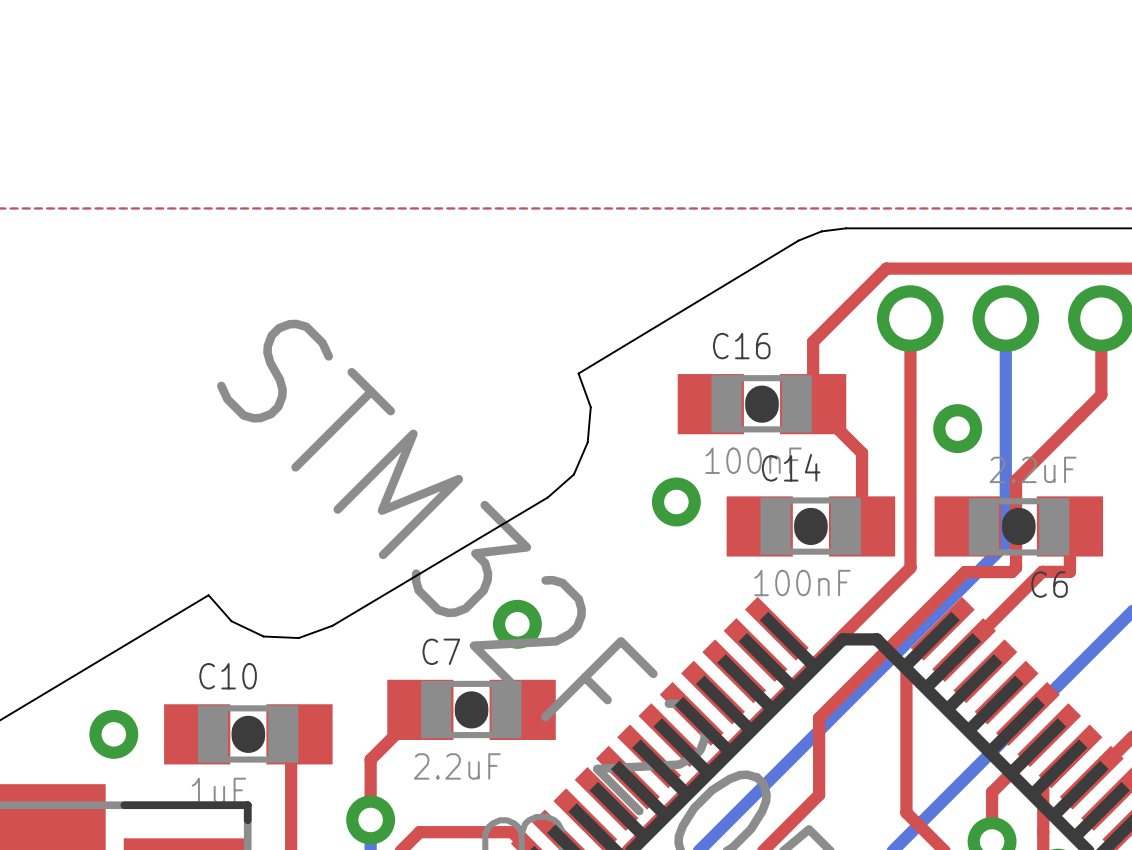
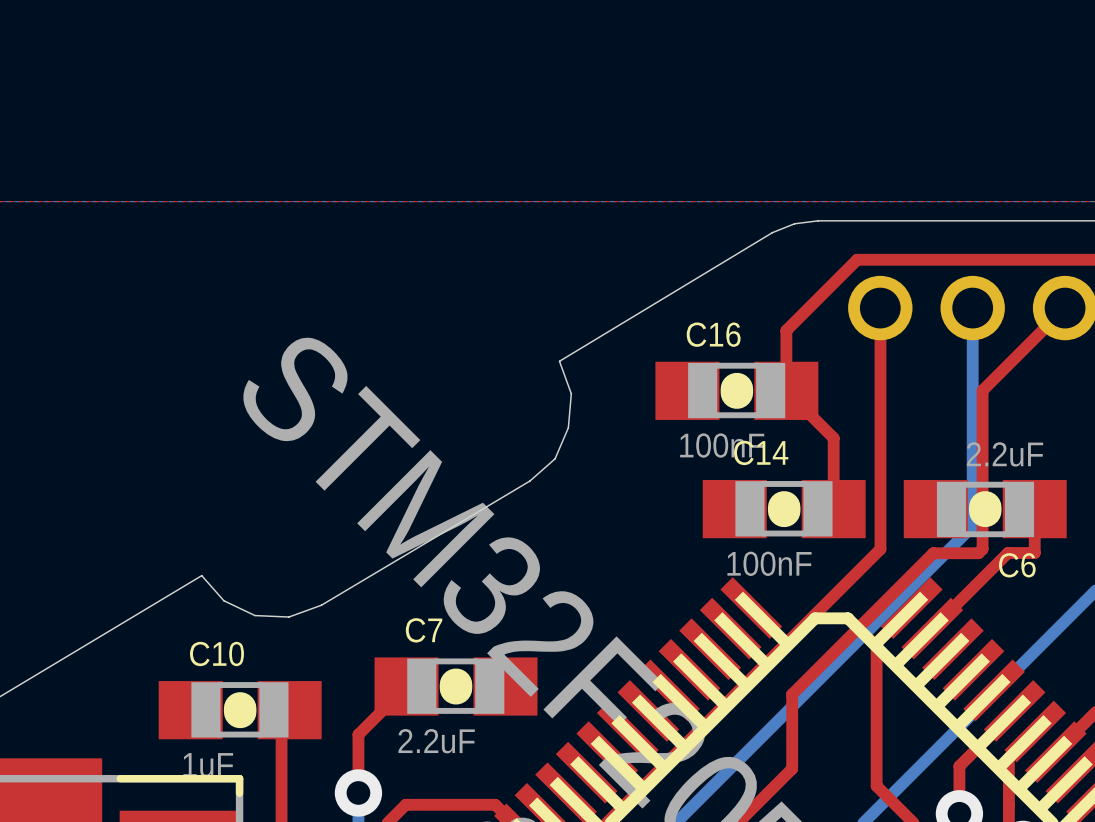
top track: (1101, 318) (1101, 394) (1016, 480) -> (1065, 308) (982, 390) (982, 464)
via: (957, 428) -> none
via: (676, 501) -> none
via: (517, 624) -> none
via: (113, 734) -> none

